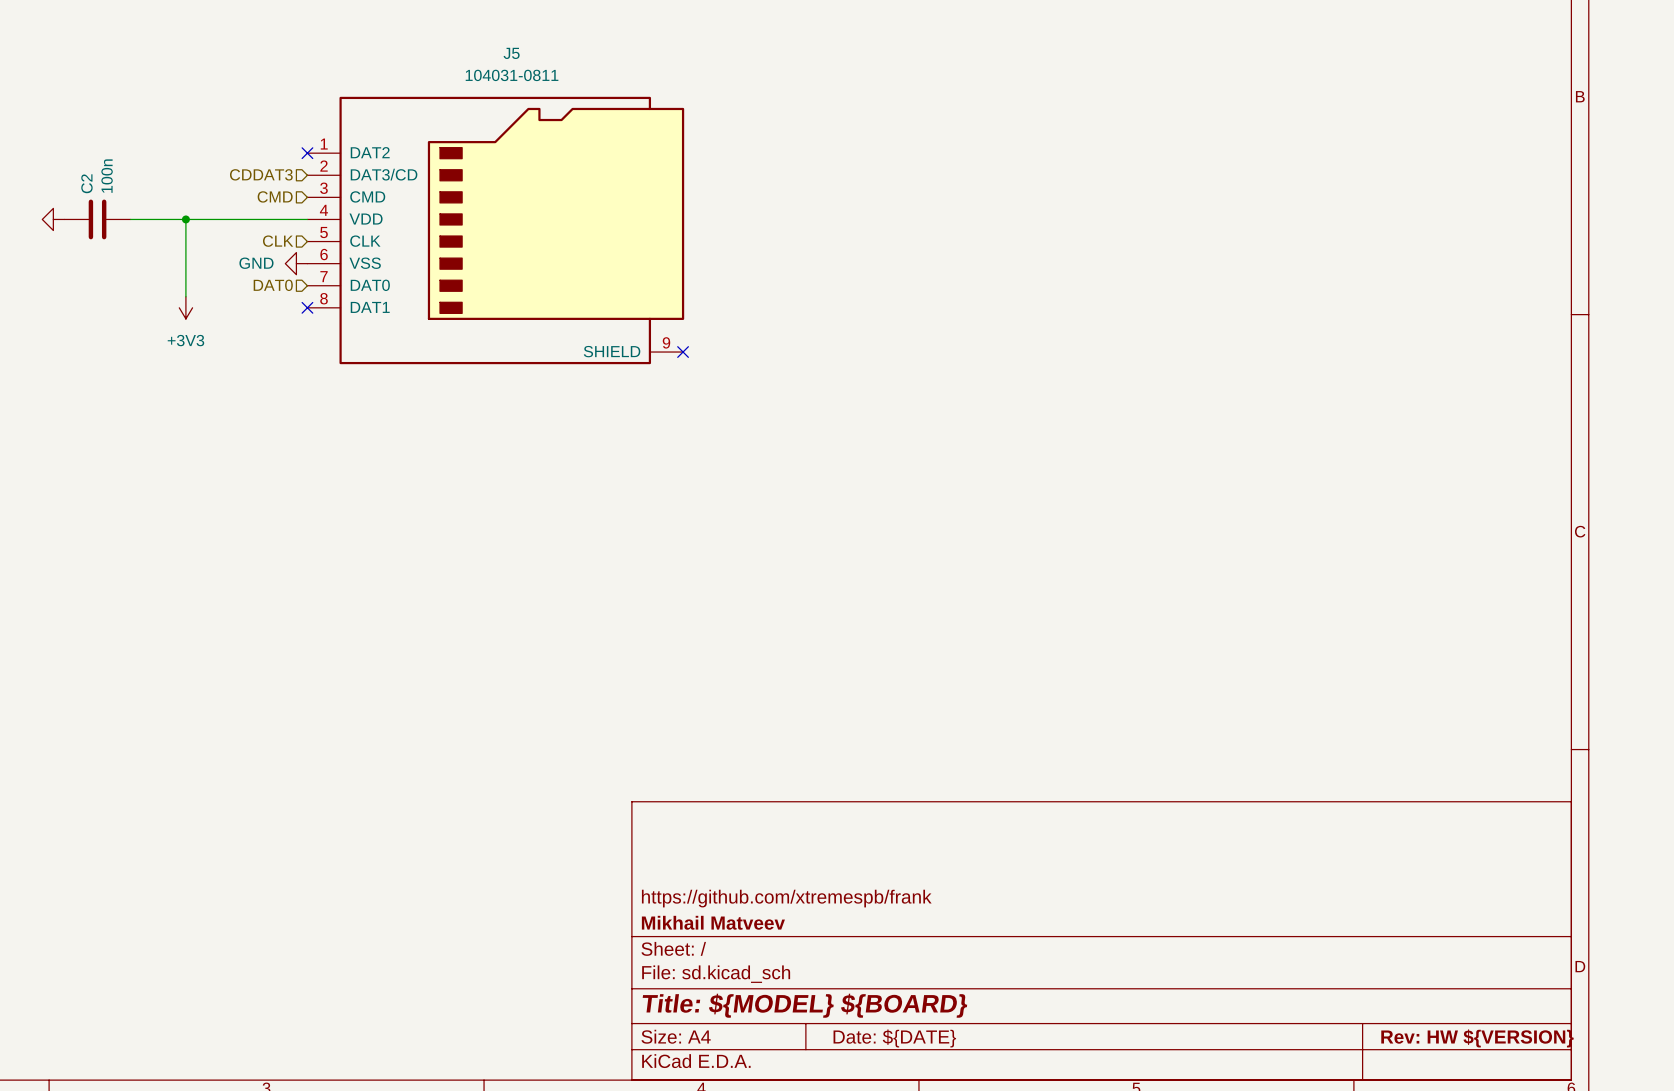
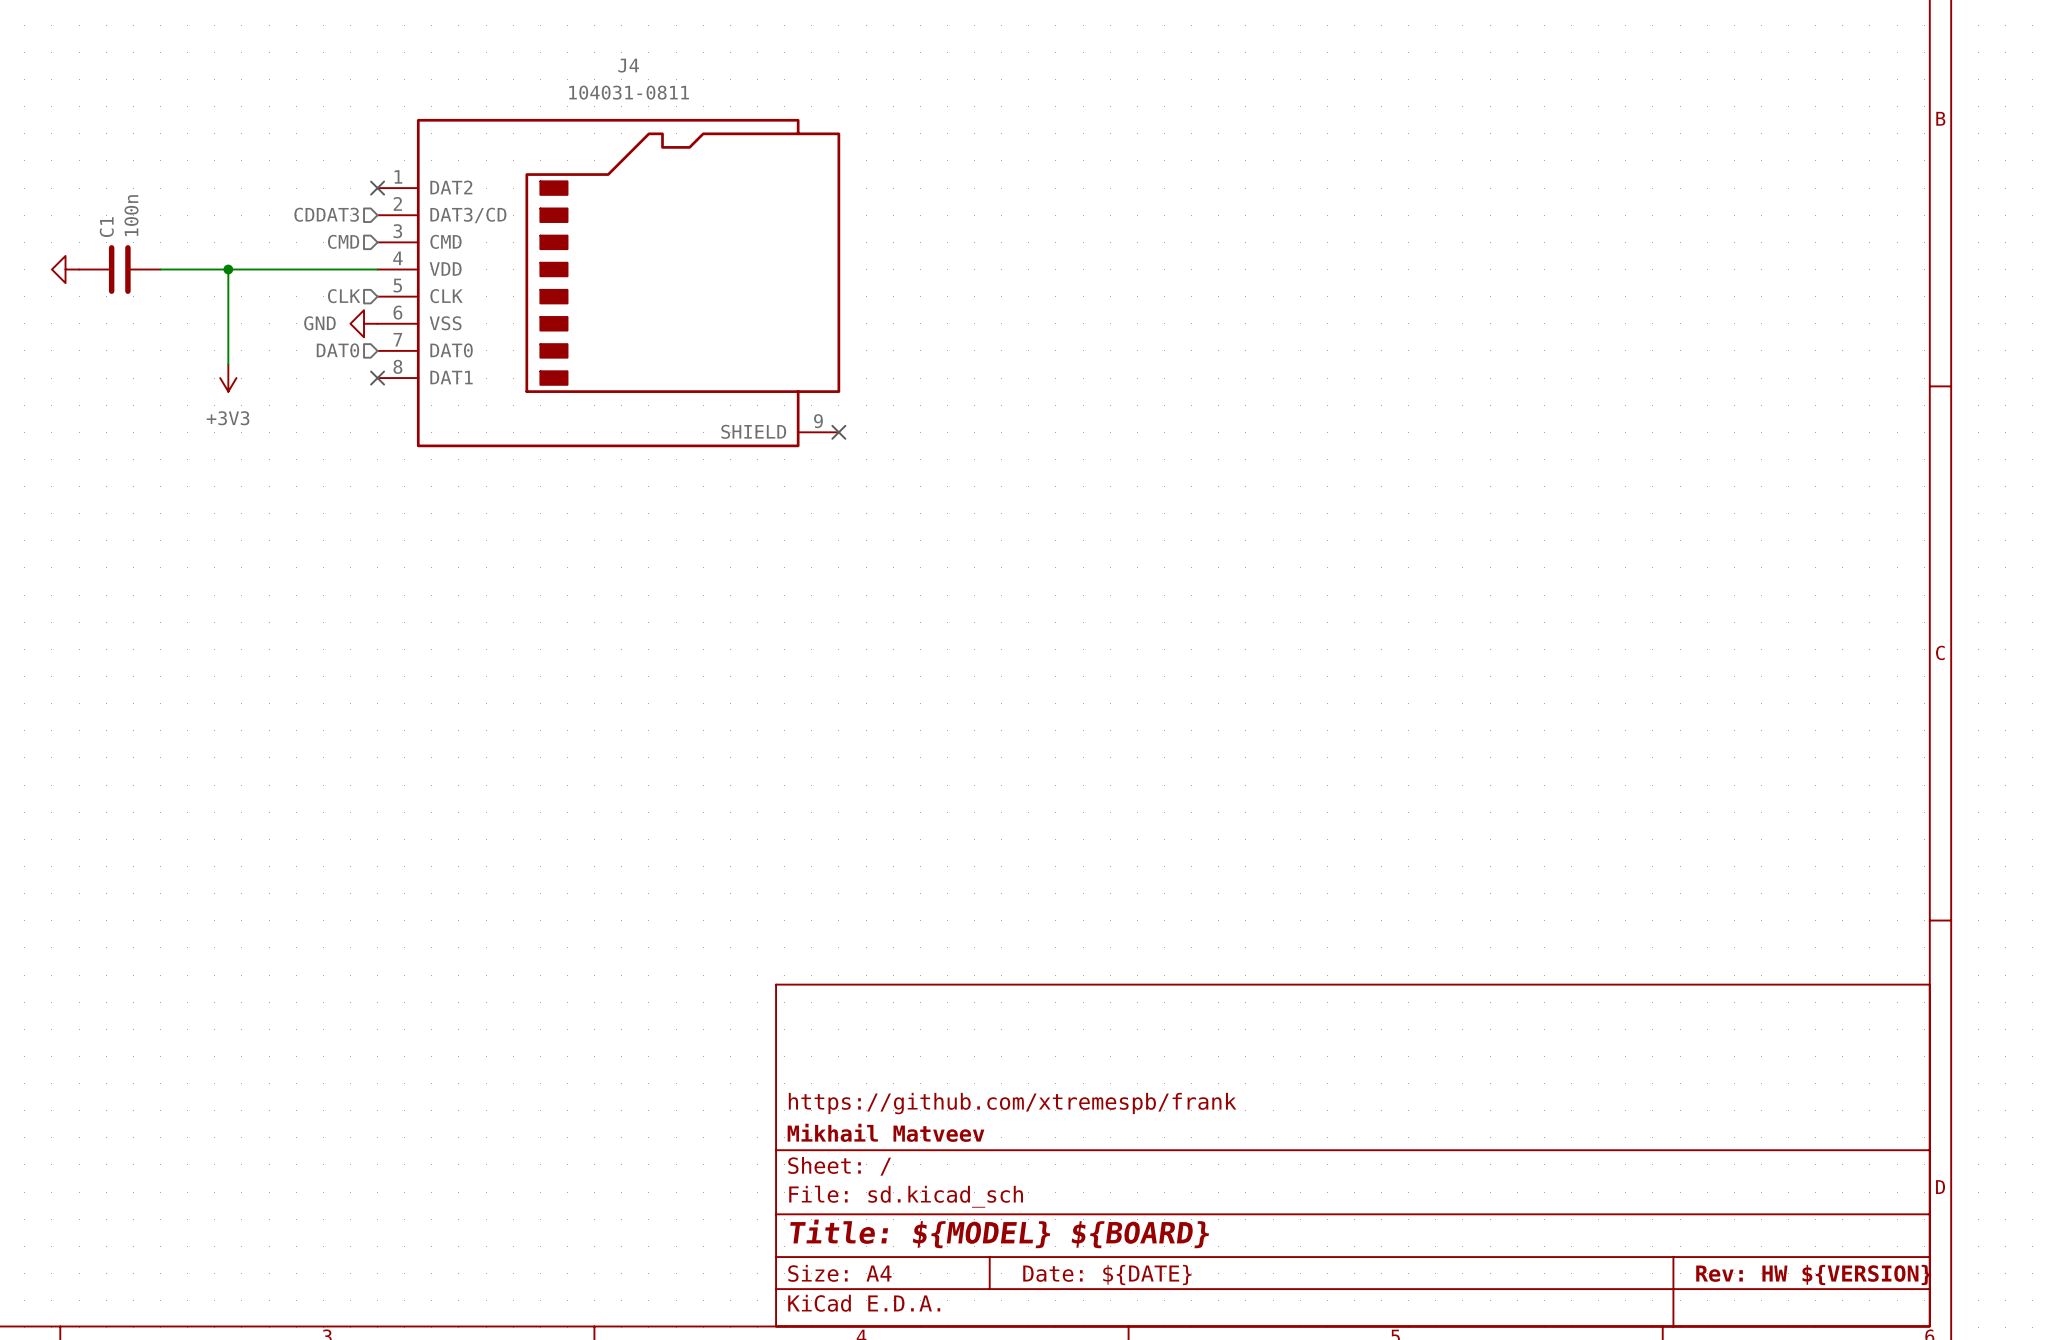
J5 name: J5 (511, 53) -> J4 (628, 65)
C2 name: C2 (86, 183) -> C1 (106, 227)

